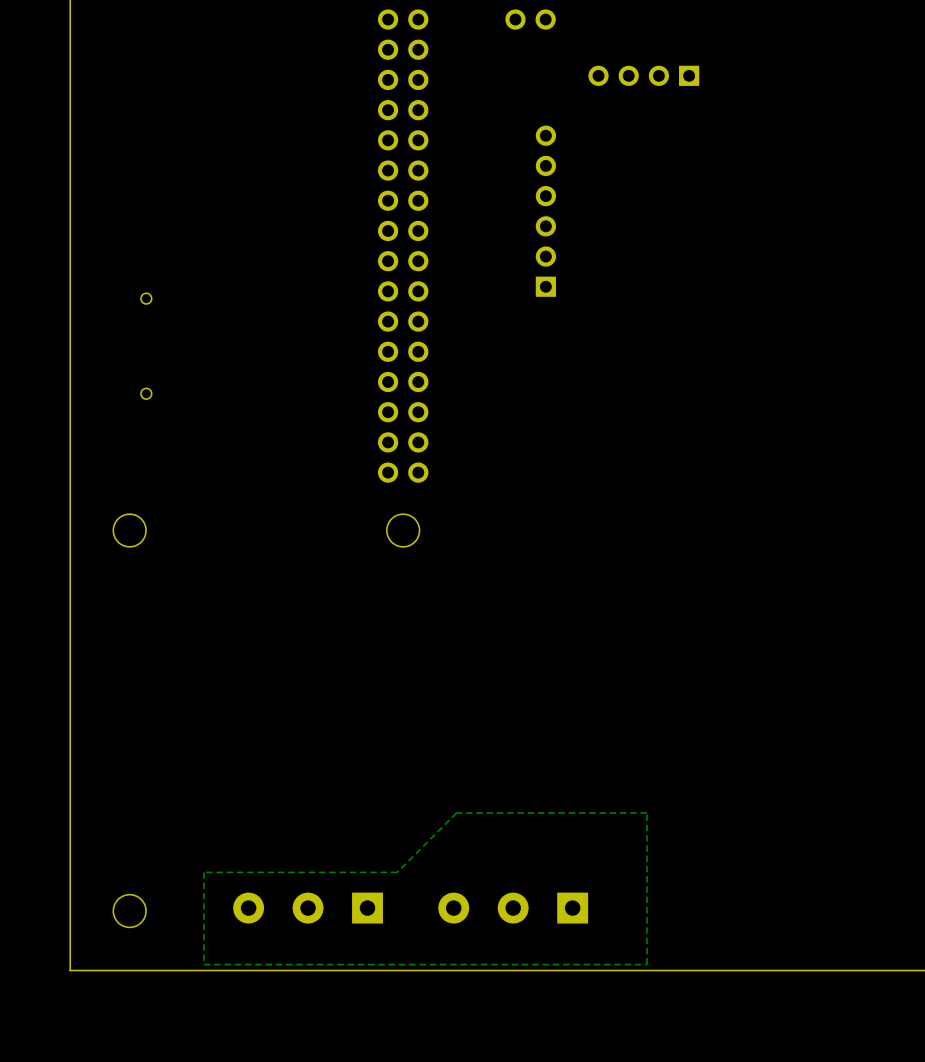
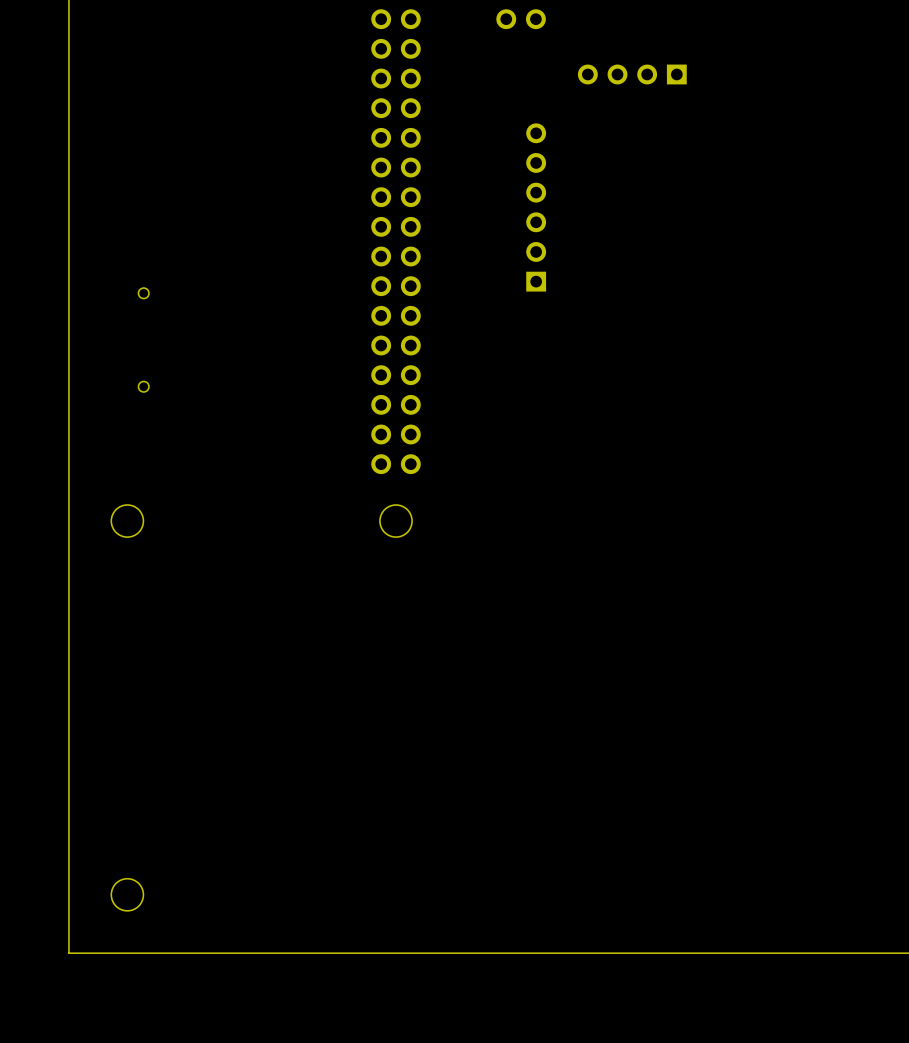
zone outline: (646, 812) (646, 964) (204, 964) (204, 872) (397, 872) (456, 812) (646, 812) -> none
part: (308, 908) -> none
part: (513, 908) -> none

